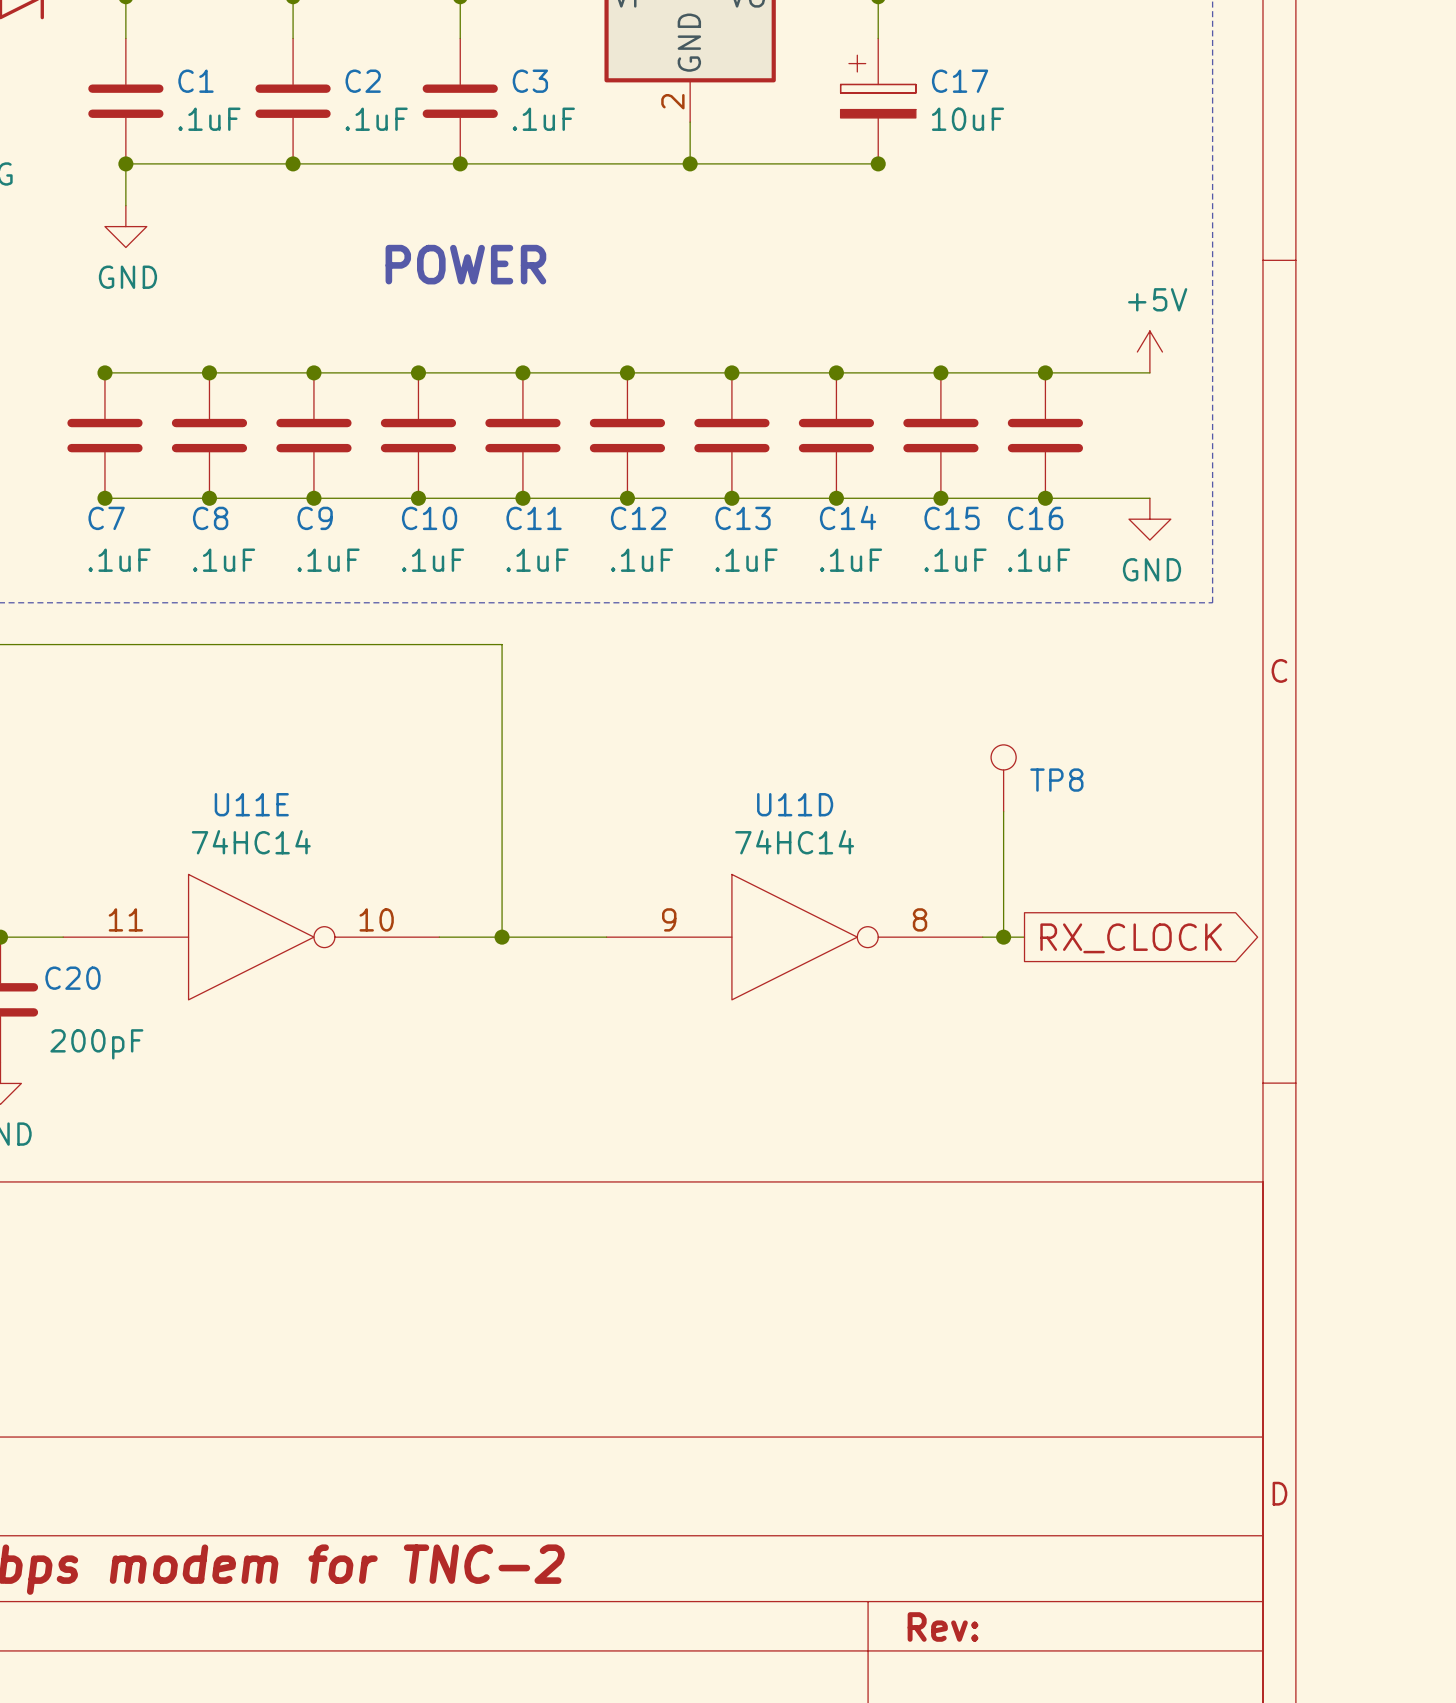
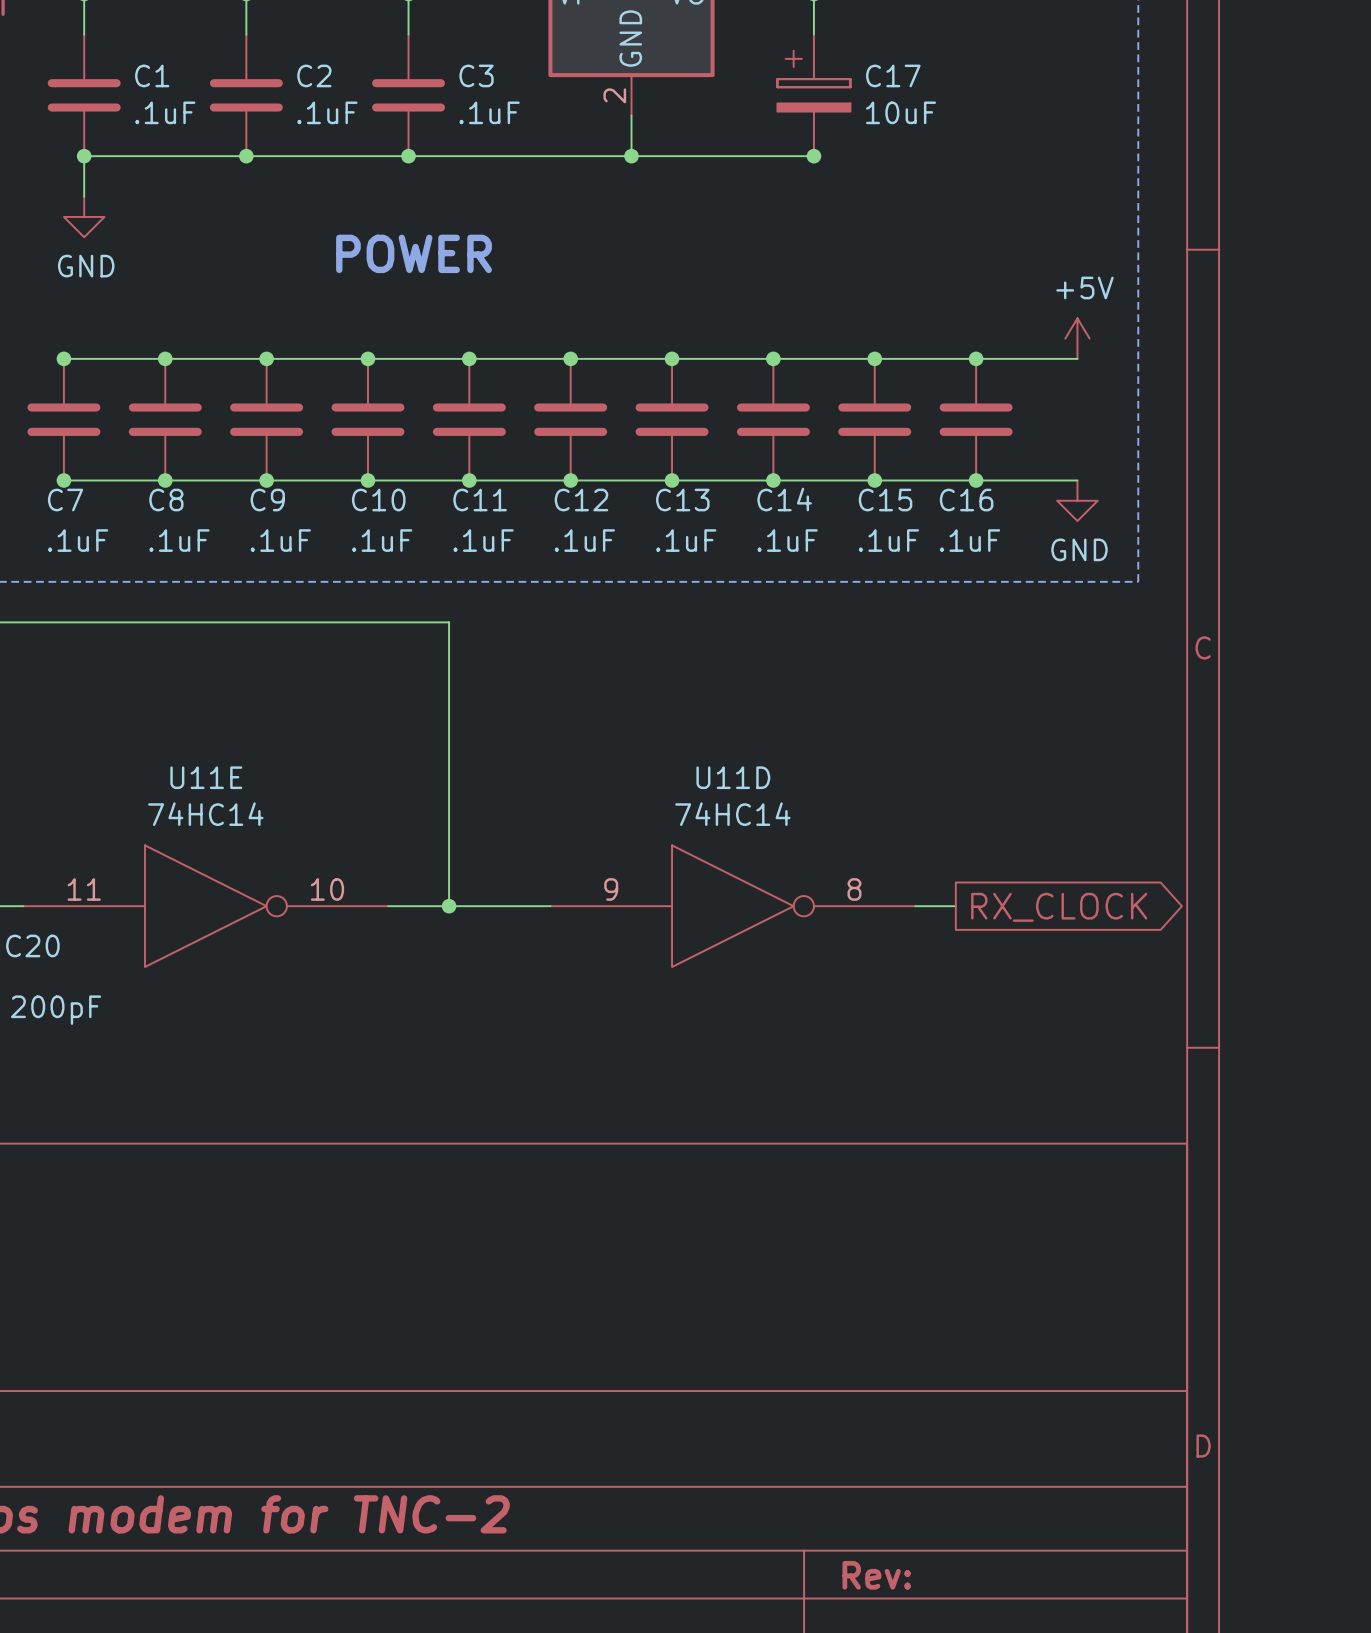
TP8: (1003, 778) -> none
wire: (1003, 811) (1003, 937) -> none
junction: (1003, 937) -> none

